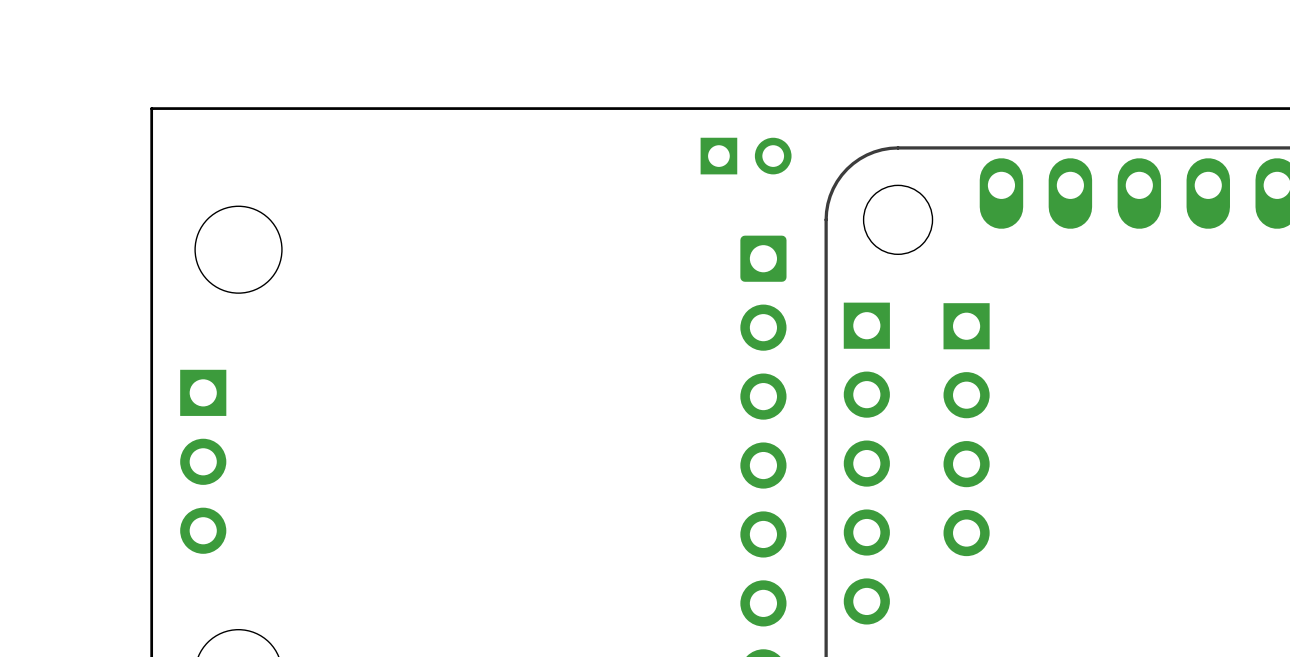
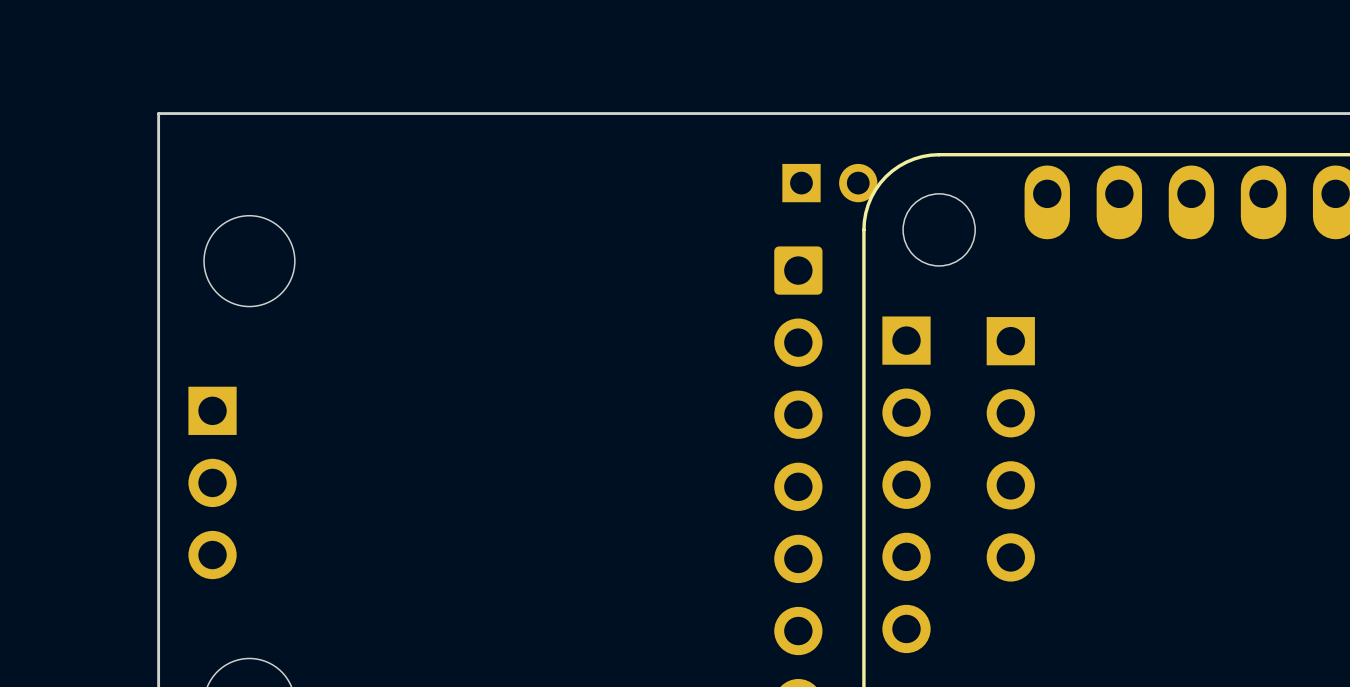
part position: (746, 156) -> (829, 183)

